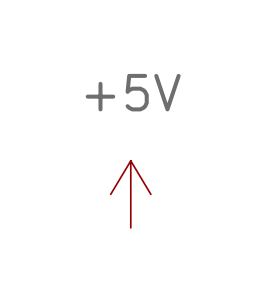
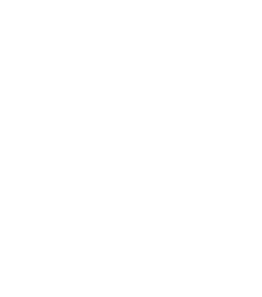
power symbol: +5V (130, 194) -> none

